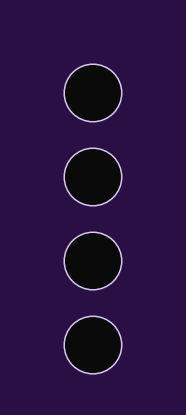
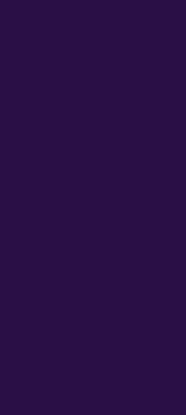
part: (92, 92) -> none
part: (92, 176) -> none
part: (92, 261) -> none
part: (92, 345) -> none

